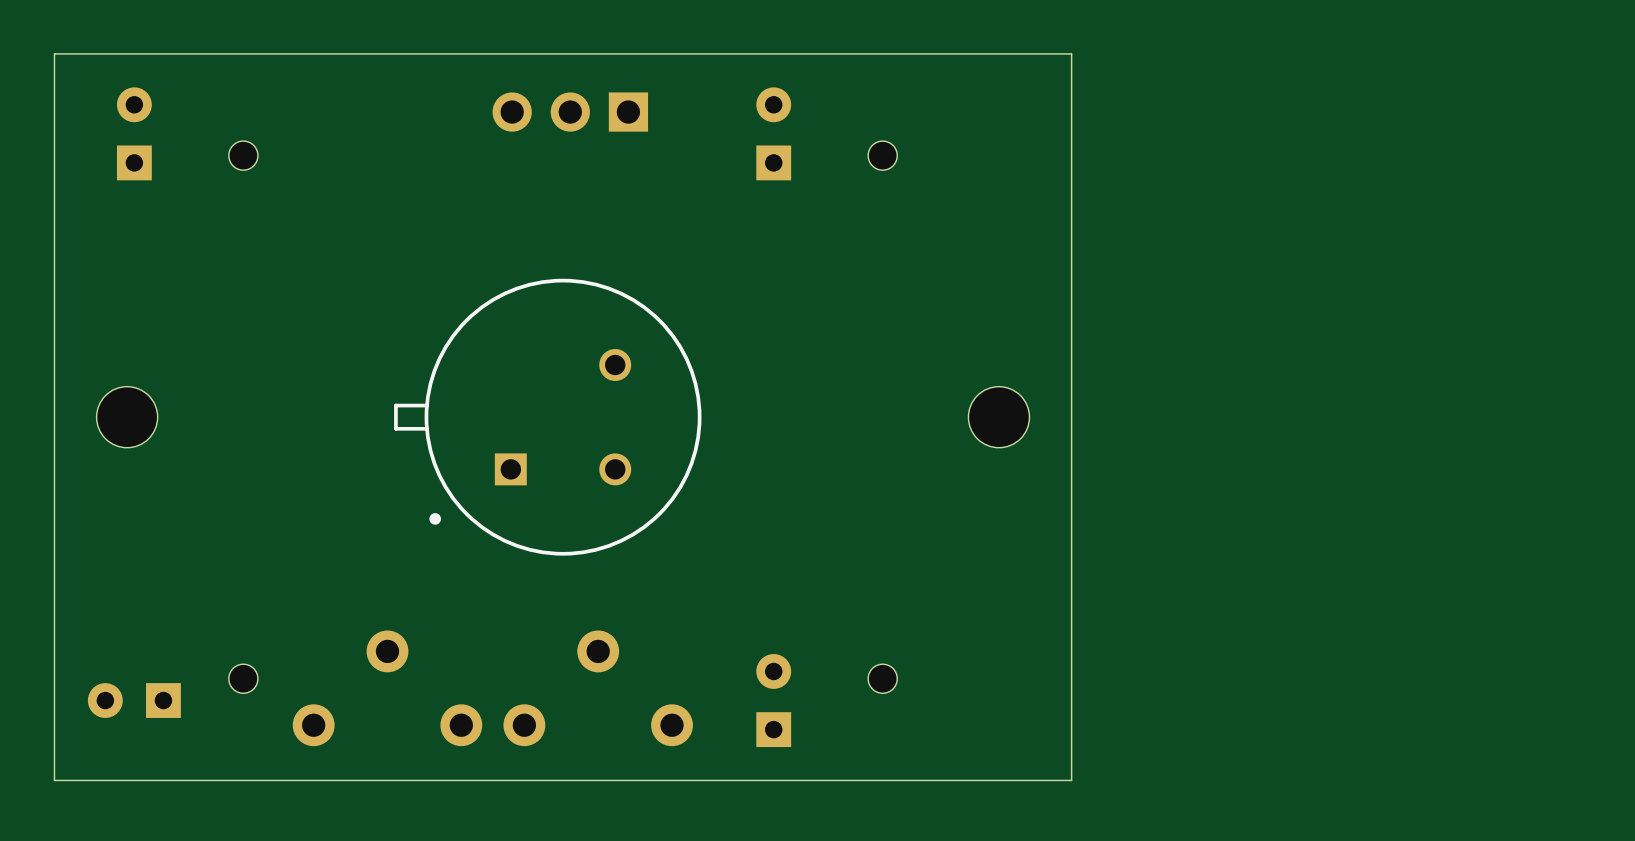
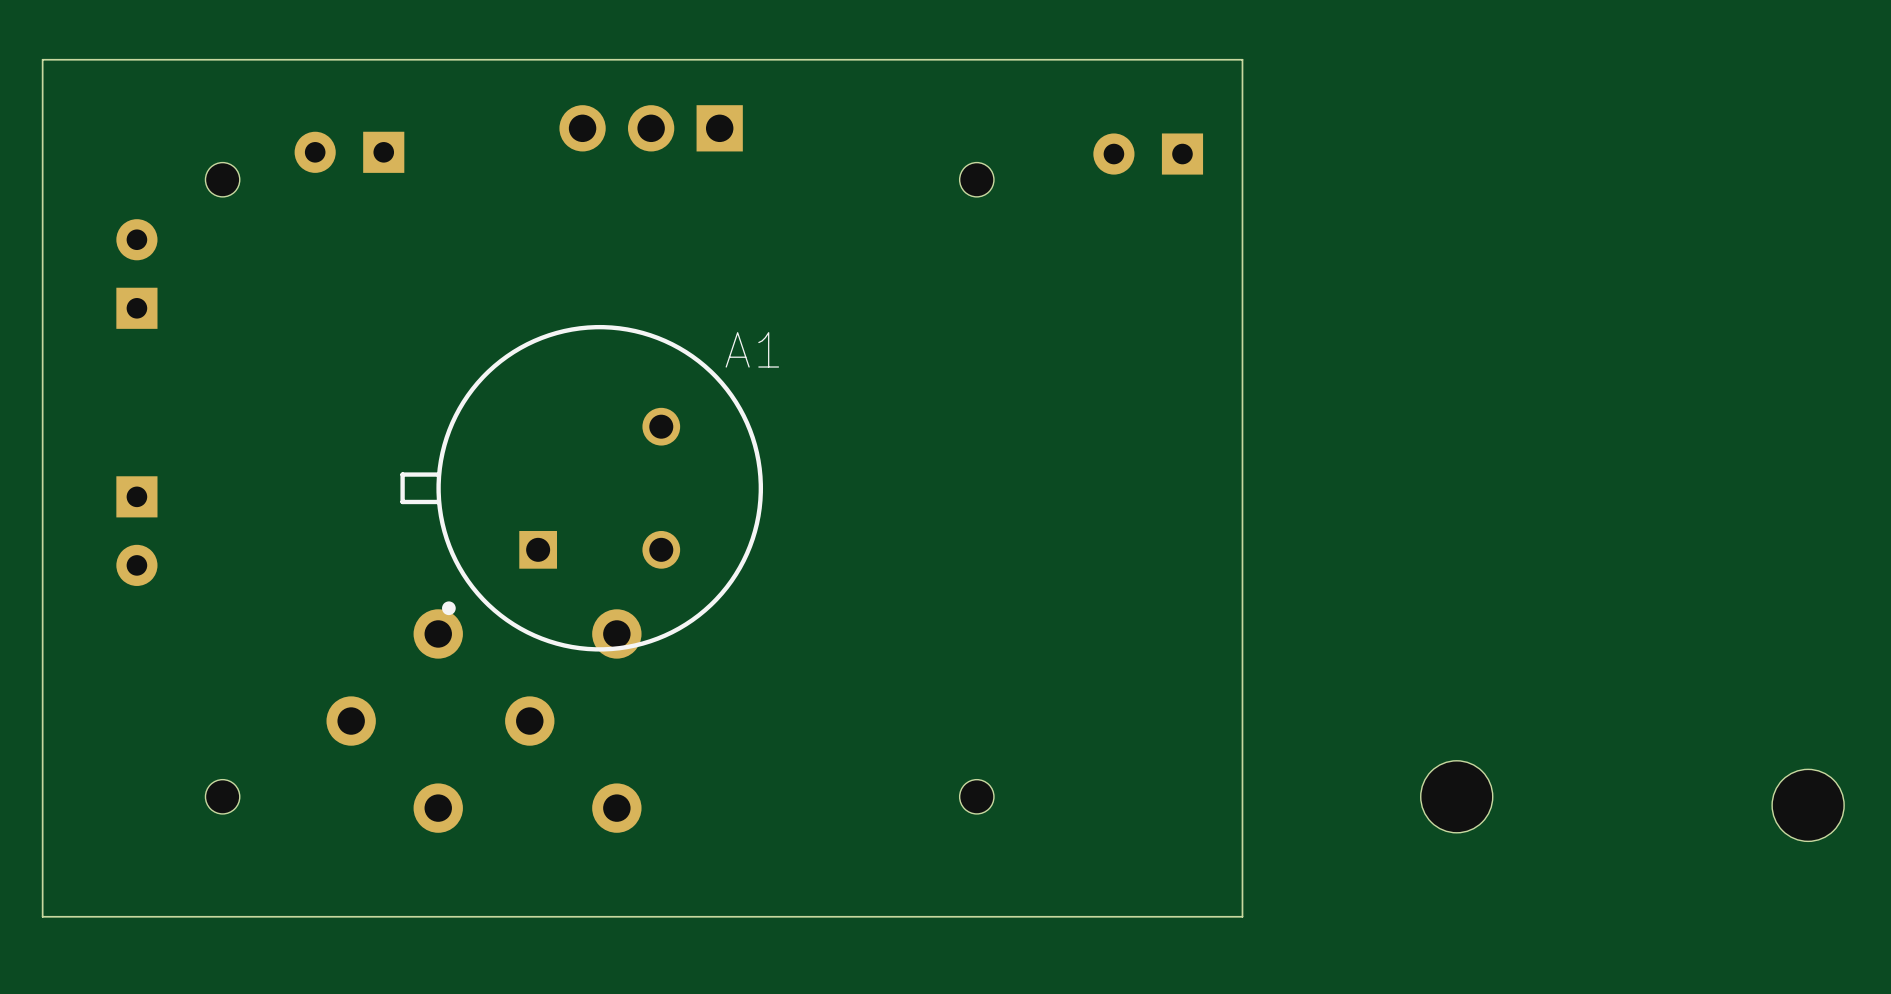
part: none -> (349, 152)
part: (134, 133) -> none
part rotation: 0° (773, 133) -> 90° counterclockwise (1148, 154)
part position: (773, 133) -> (1148, 154)
part position: (243, 155) -> (222, 179)
part position: (882, 155) -> (976, 179)
part: none -> (136, 274)
part: (127, 417) -> none
A1: none -> (581, 488)
part: (547, 417) -> none
part: (998, 417) -> none
part: none -> (136, 531)
part: none -> (394, 721)
part: none -> (573, 721)
part position: (243, 678) -> (222, 796)
part position: (882, 678) -> (976, 796)
part: none -> (1456, 796)
part: none -> (1808, 805)
part: (387, 688) -> none
part: (598, 688) -> none
part: (134, 700) -> none
part: (773, 700) -> none

